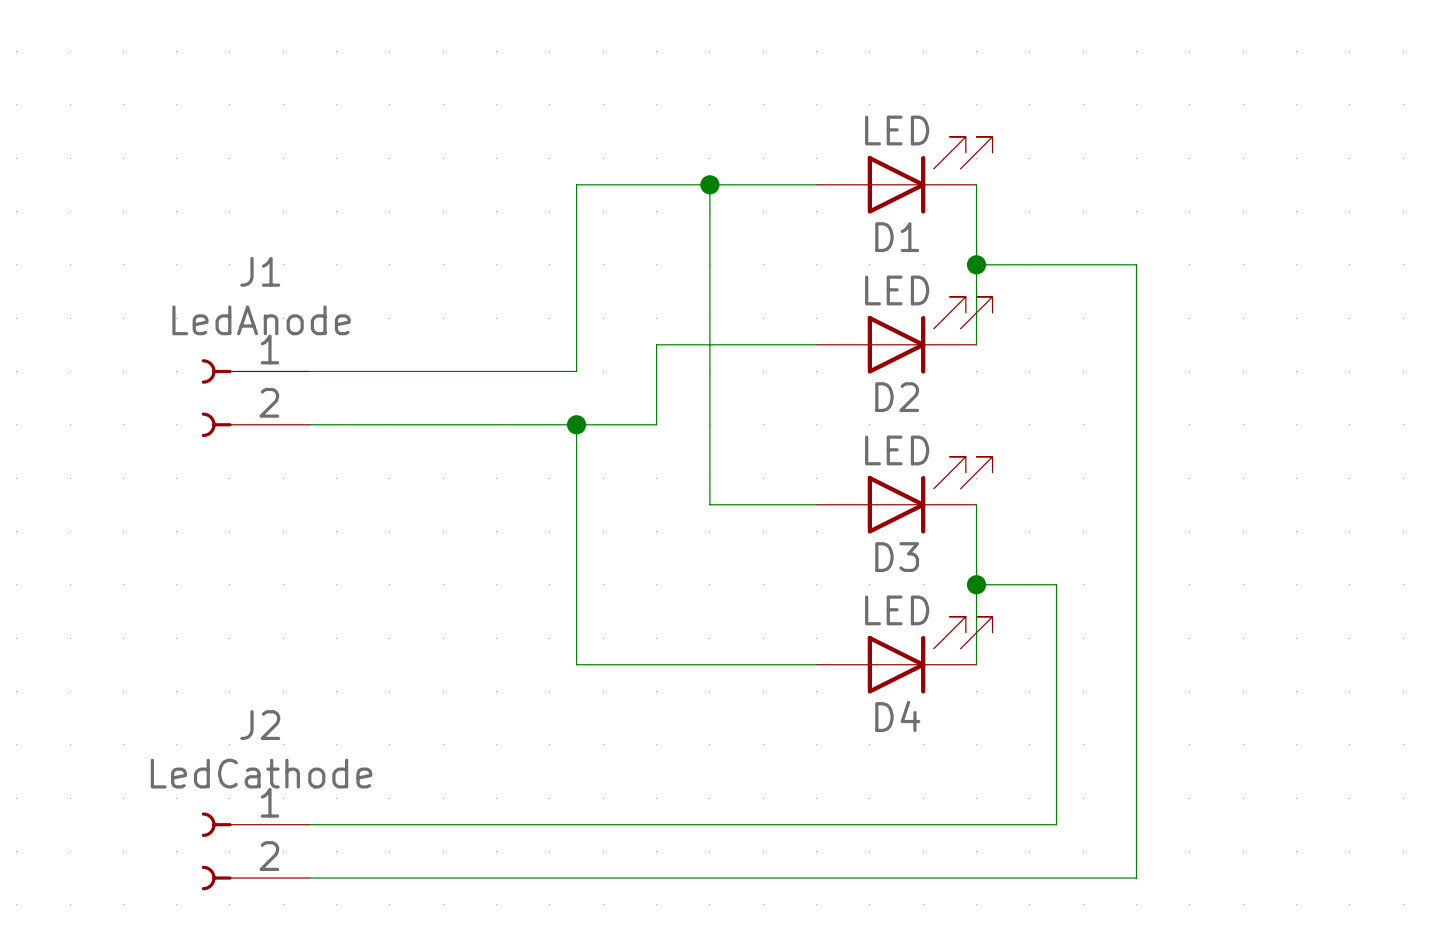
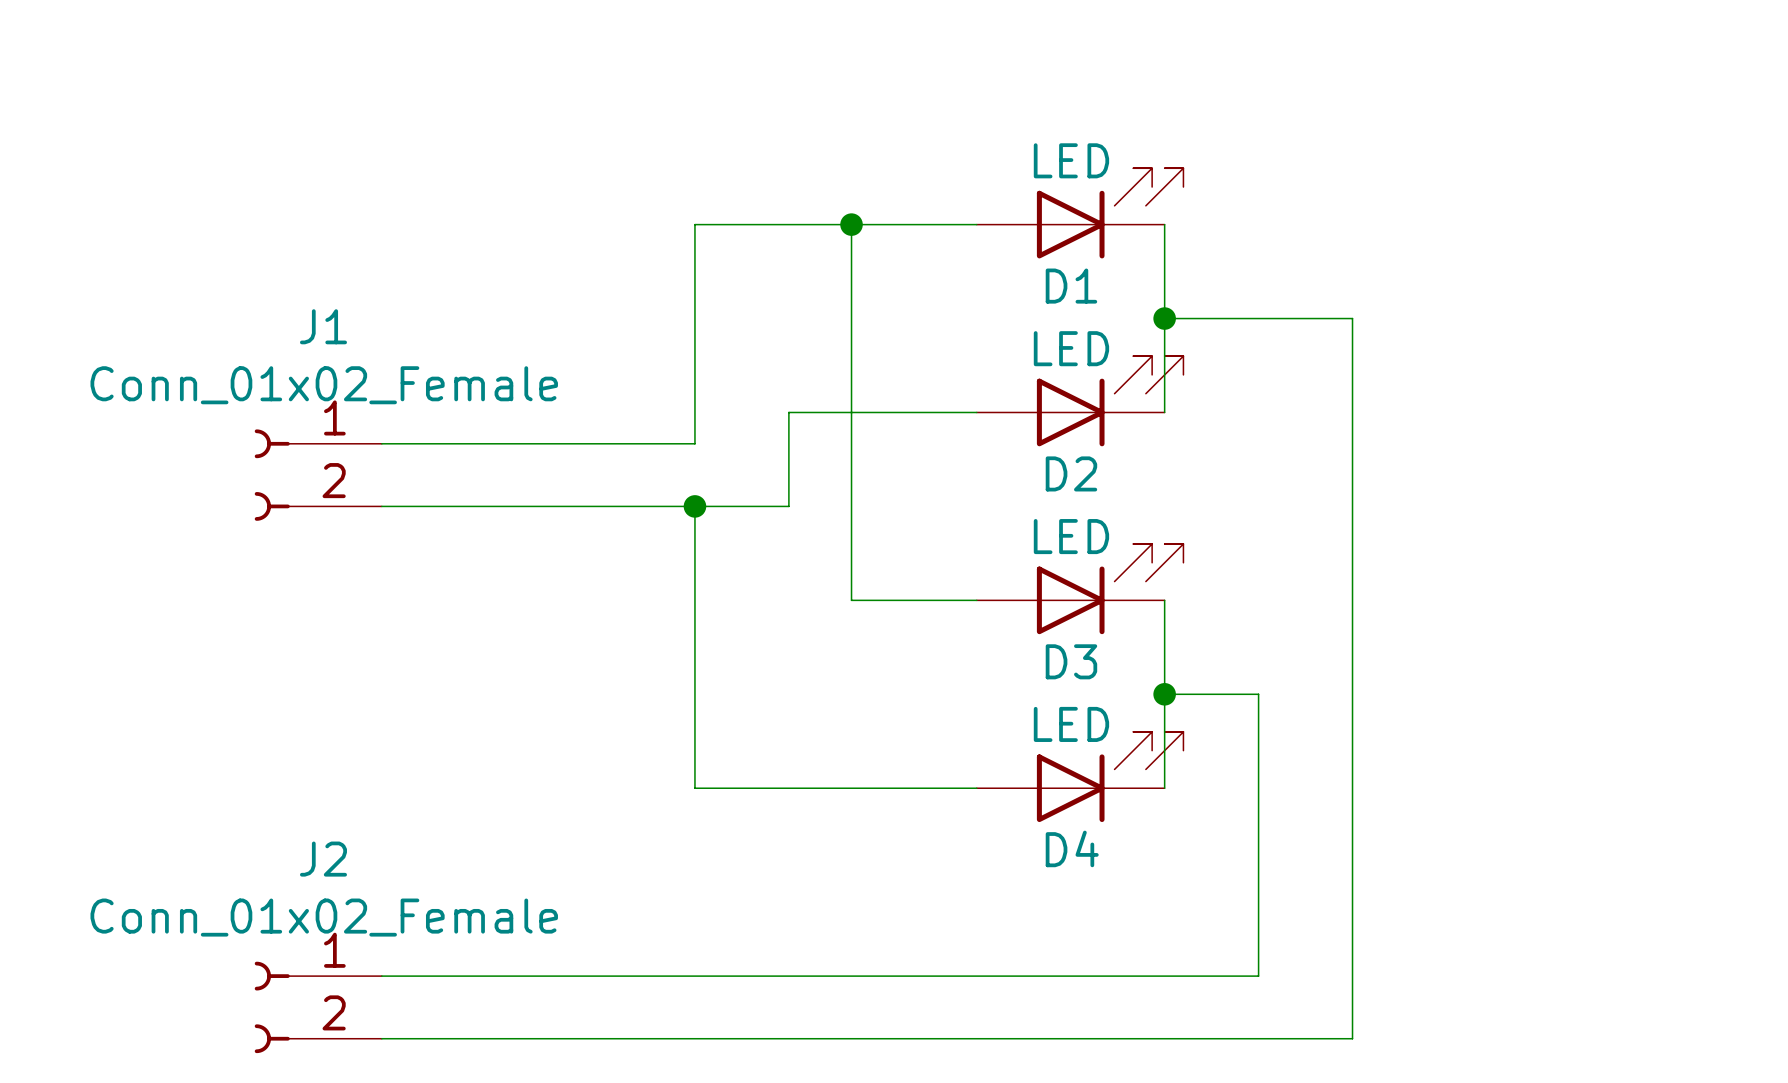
J1 value: LedAnode (261, 320) -> Conn_01x02_Female (324, 385)
J2 value: LedCathode (261, 773) -> Conn_01x02_Female (324, 917)

